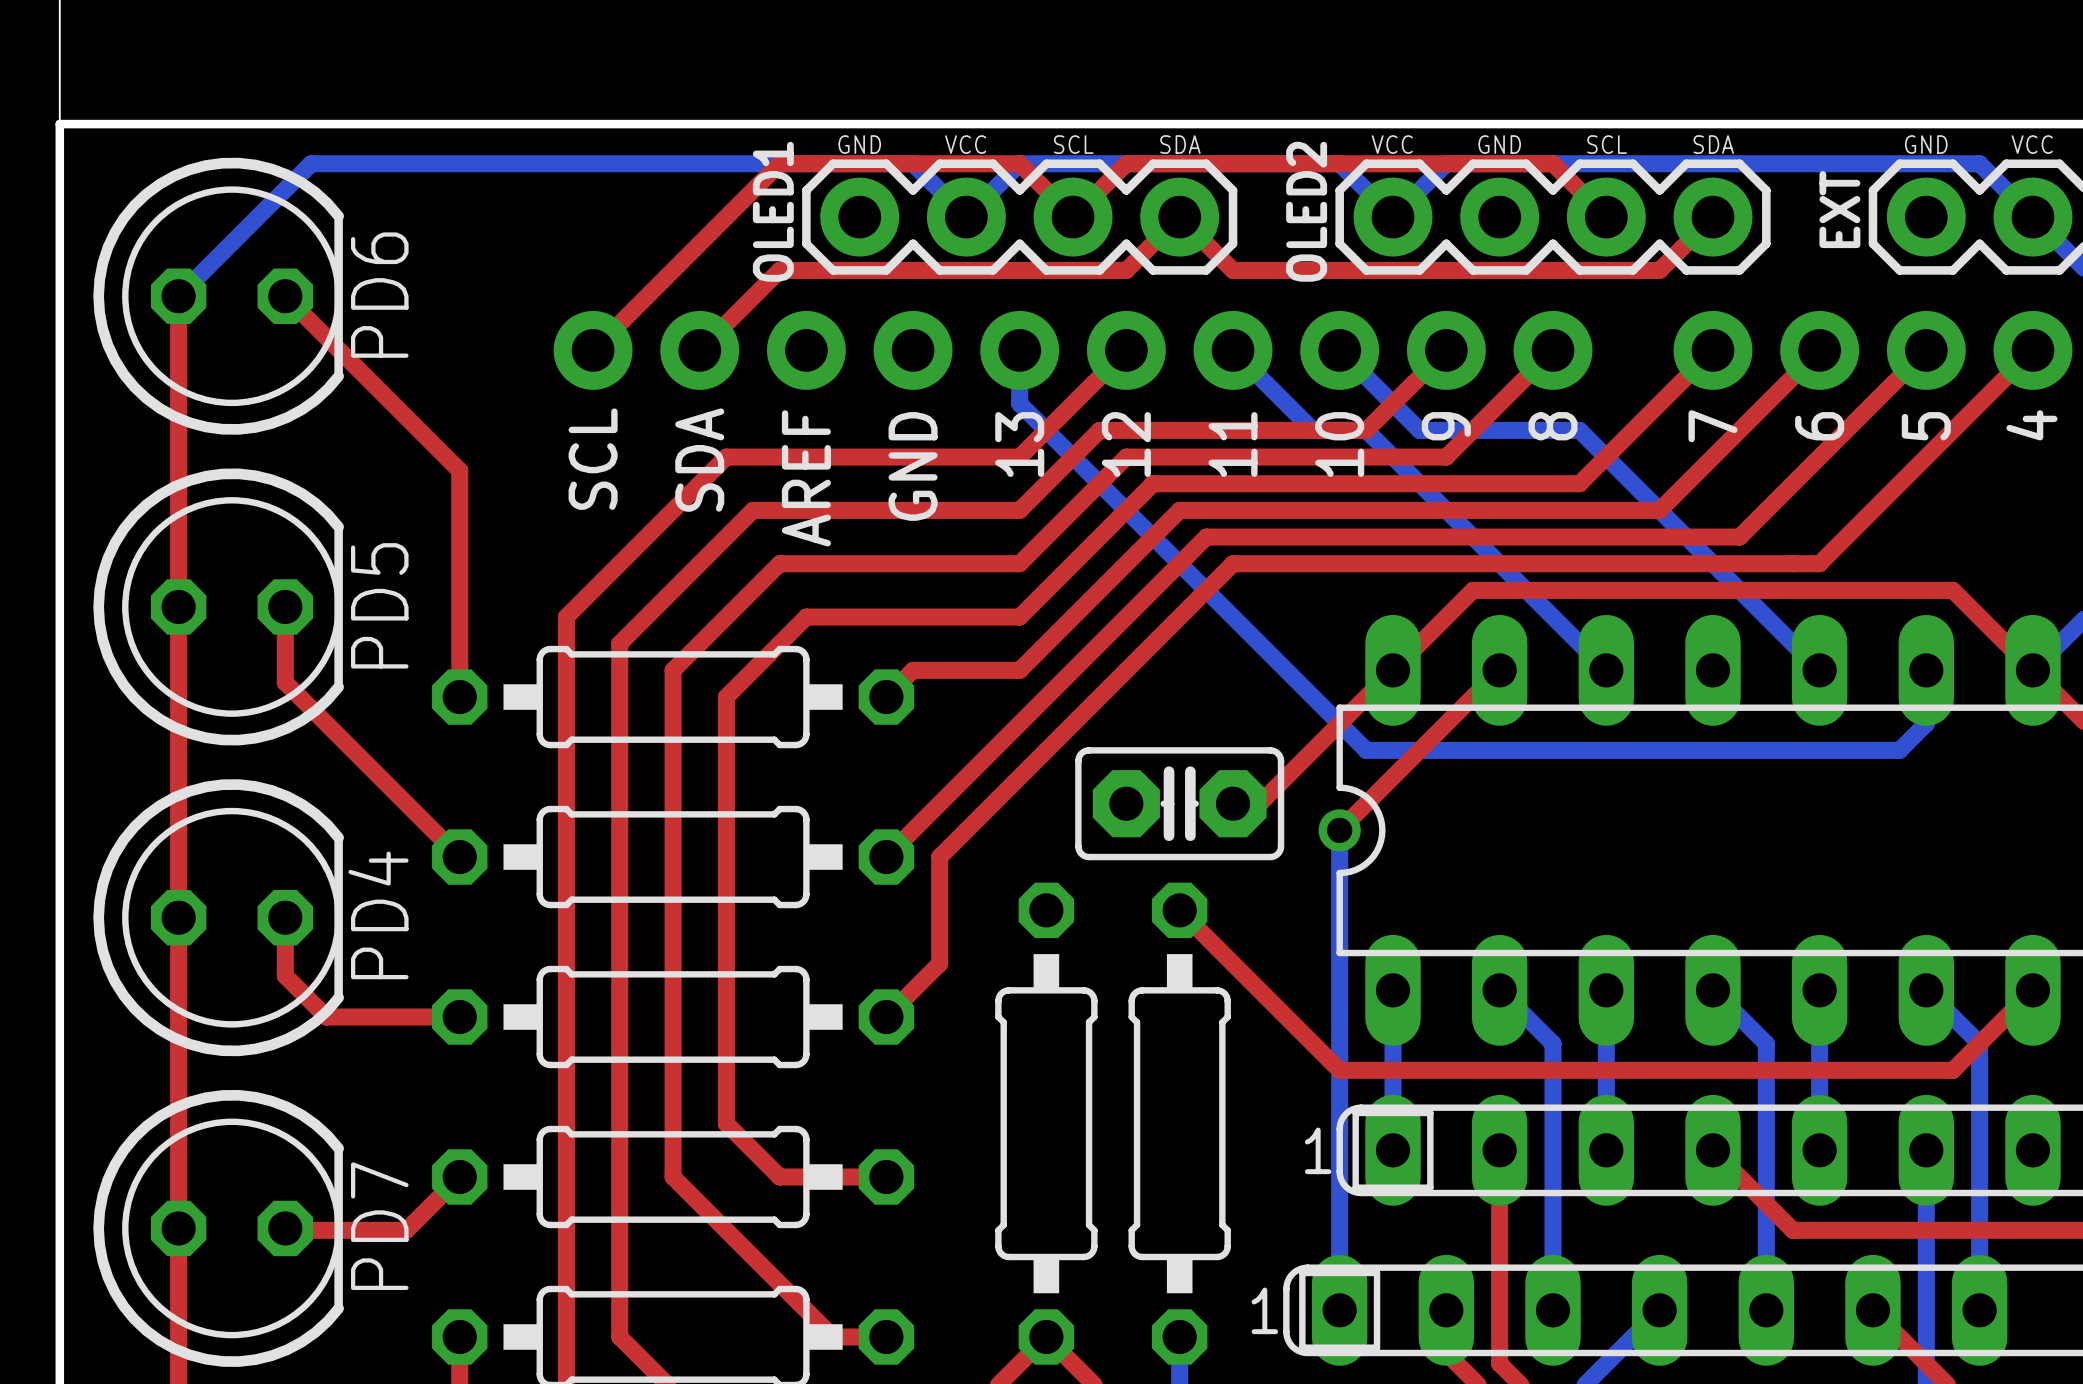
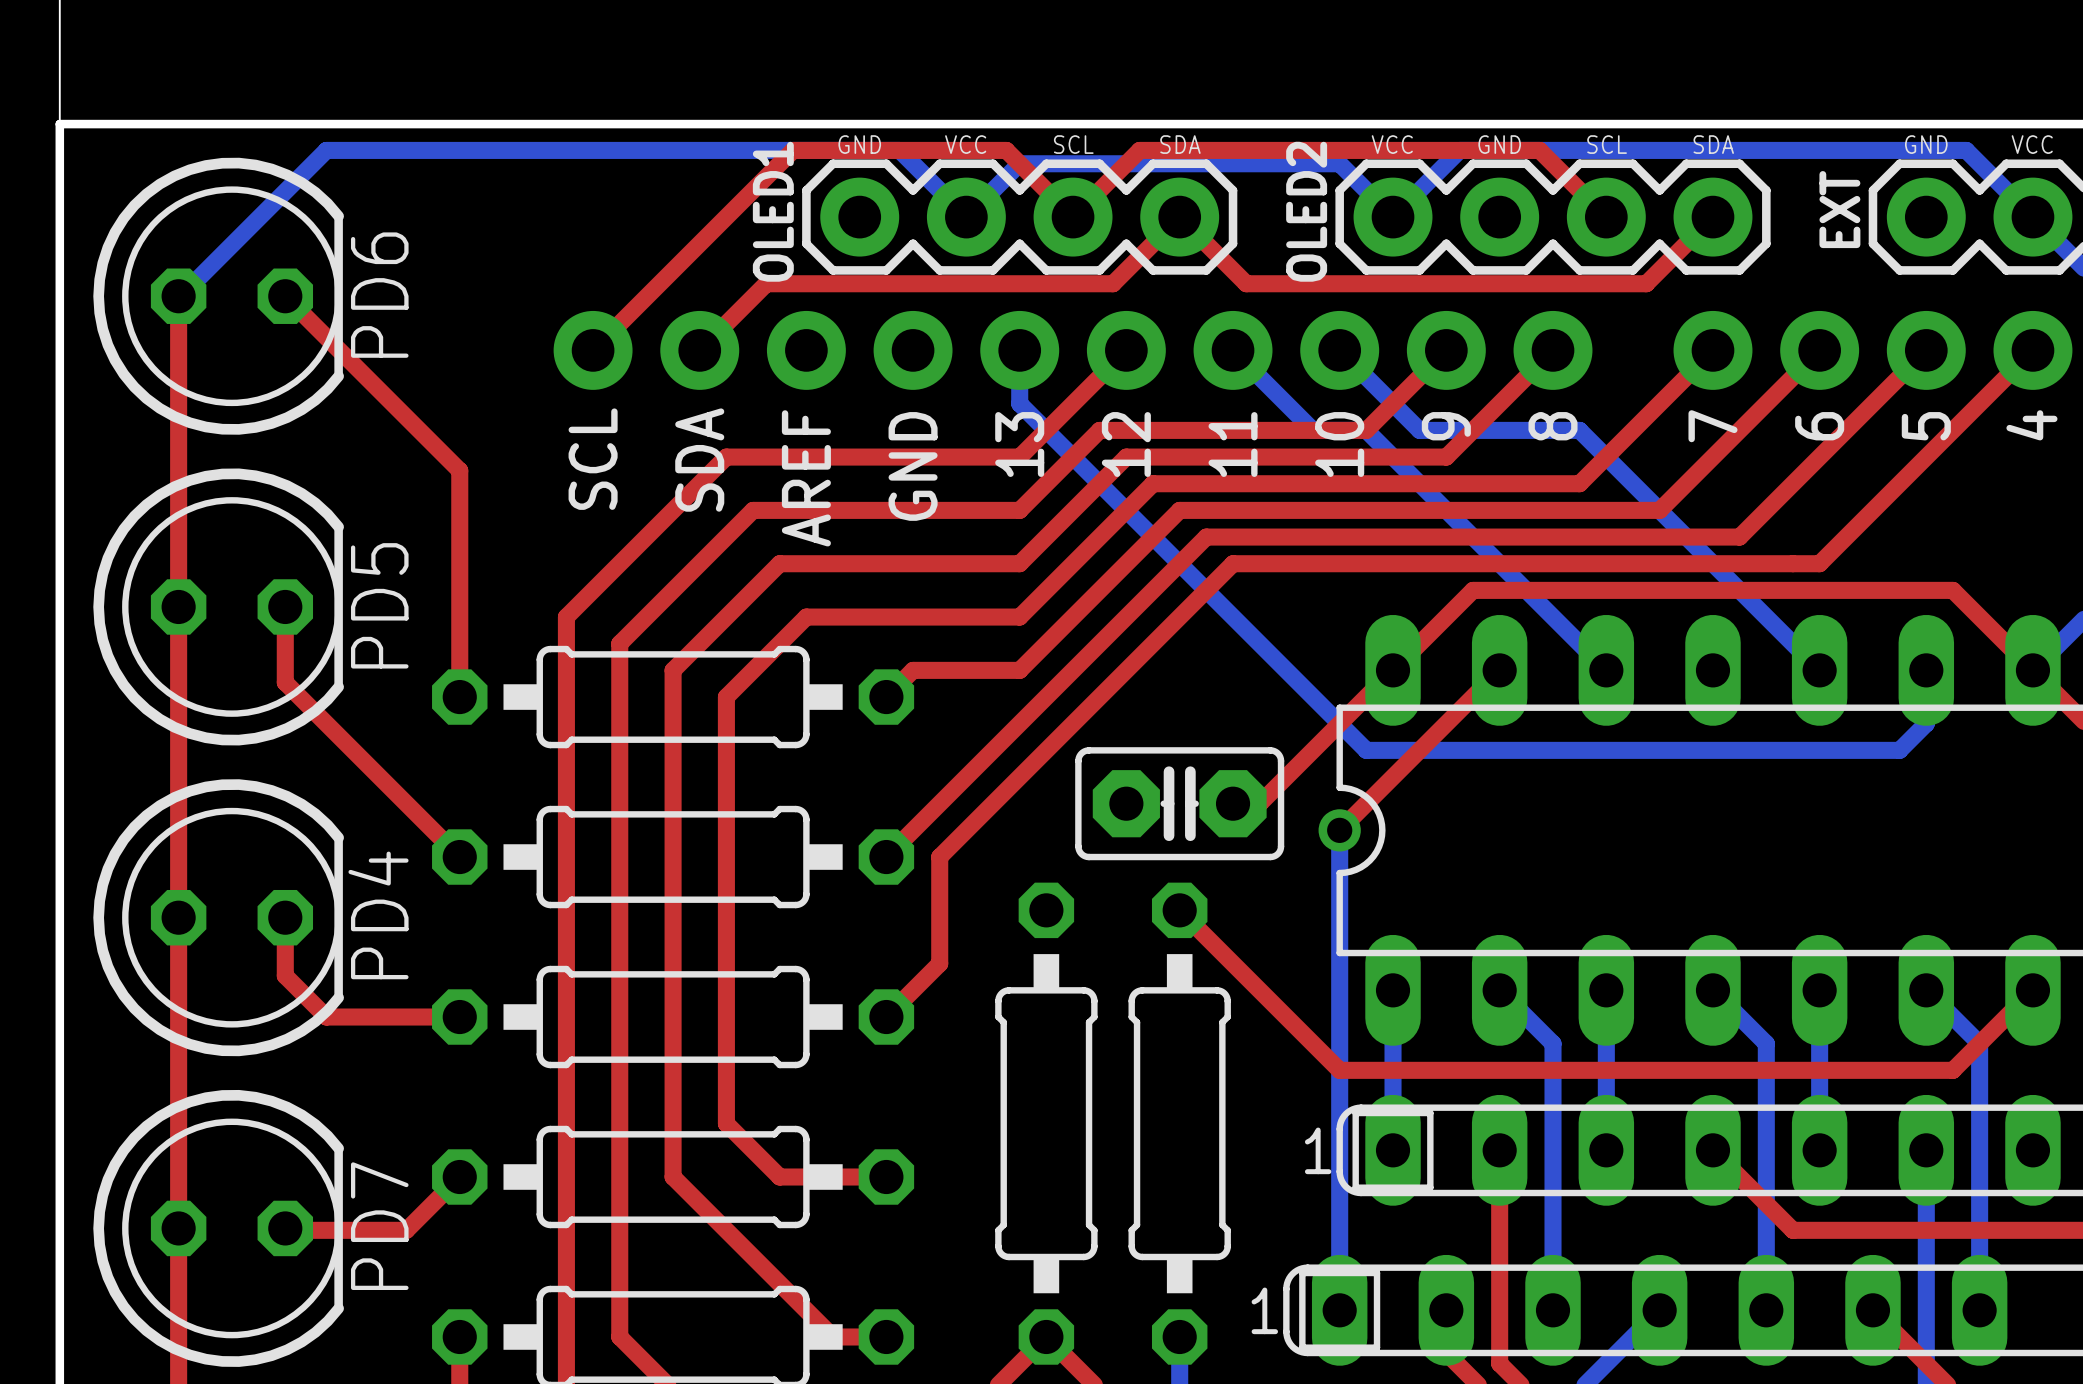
top track: (779, 163) (1019, 163) -> (779, 163) (793, 150) (1006, 150) (1019, 163)
bottom track: (913, 163) (311, 163) (178, 296) -> (913, 163) (899, 150) (326, 150) (178, 296)
top track: (1126, 163) (1553, 163) -> (1126, 163) (1139, 150) (1539, 150) (1553, 163)
bottom track: (1446, 163) (1979, 163) -> (1446, 163) (1459, 150) (1966, 150) (1979, 163)
top track: (1126, 270) (779, 270) (766, 283) -> (1126, 270) (1113, 283) (766, 283)
top track: (1233, 270) (1659, 270) -> (1233, 270) (1246, 283) (1646, 283) (1659, 270)

